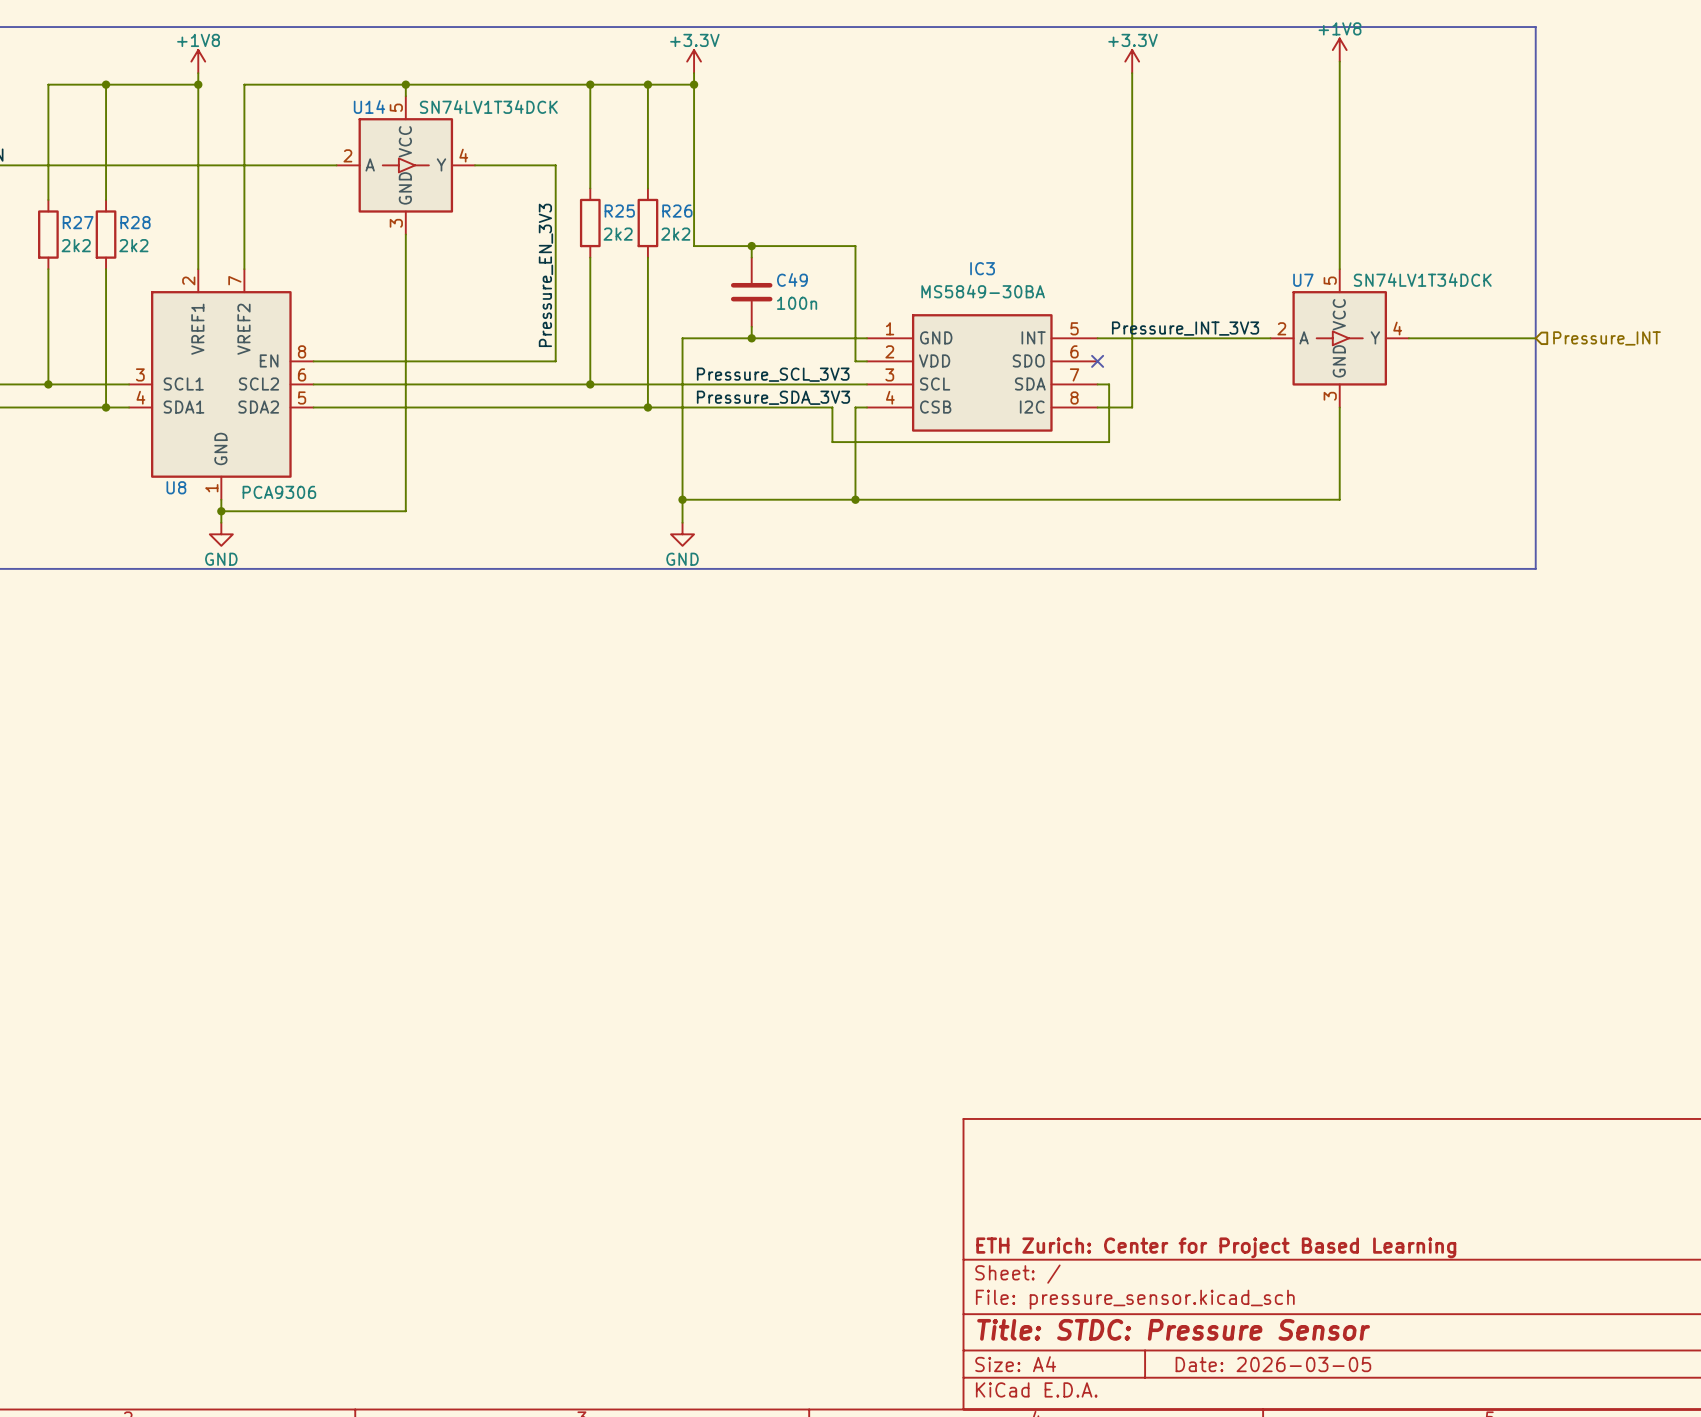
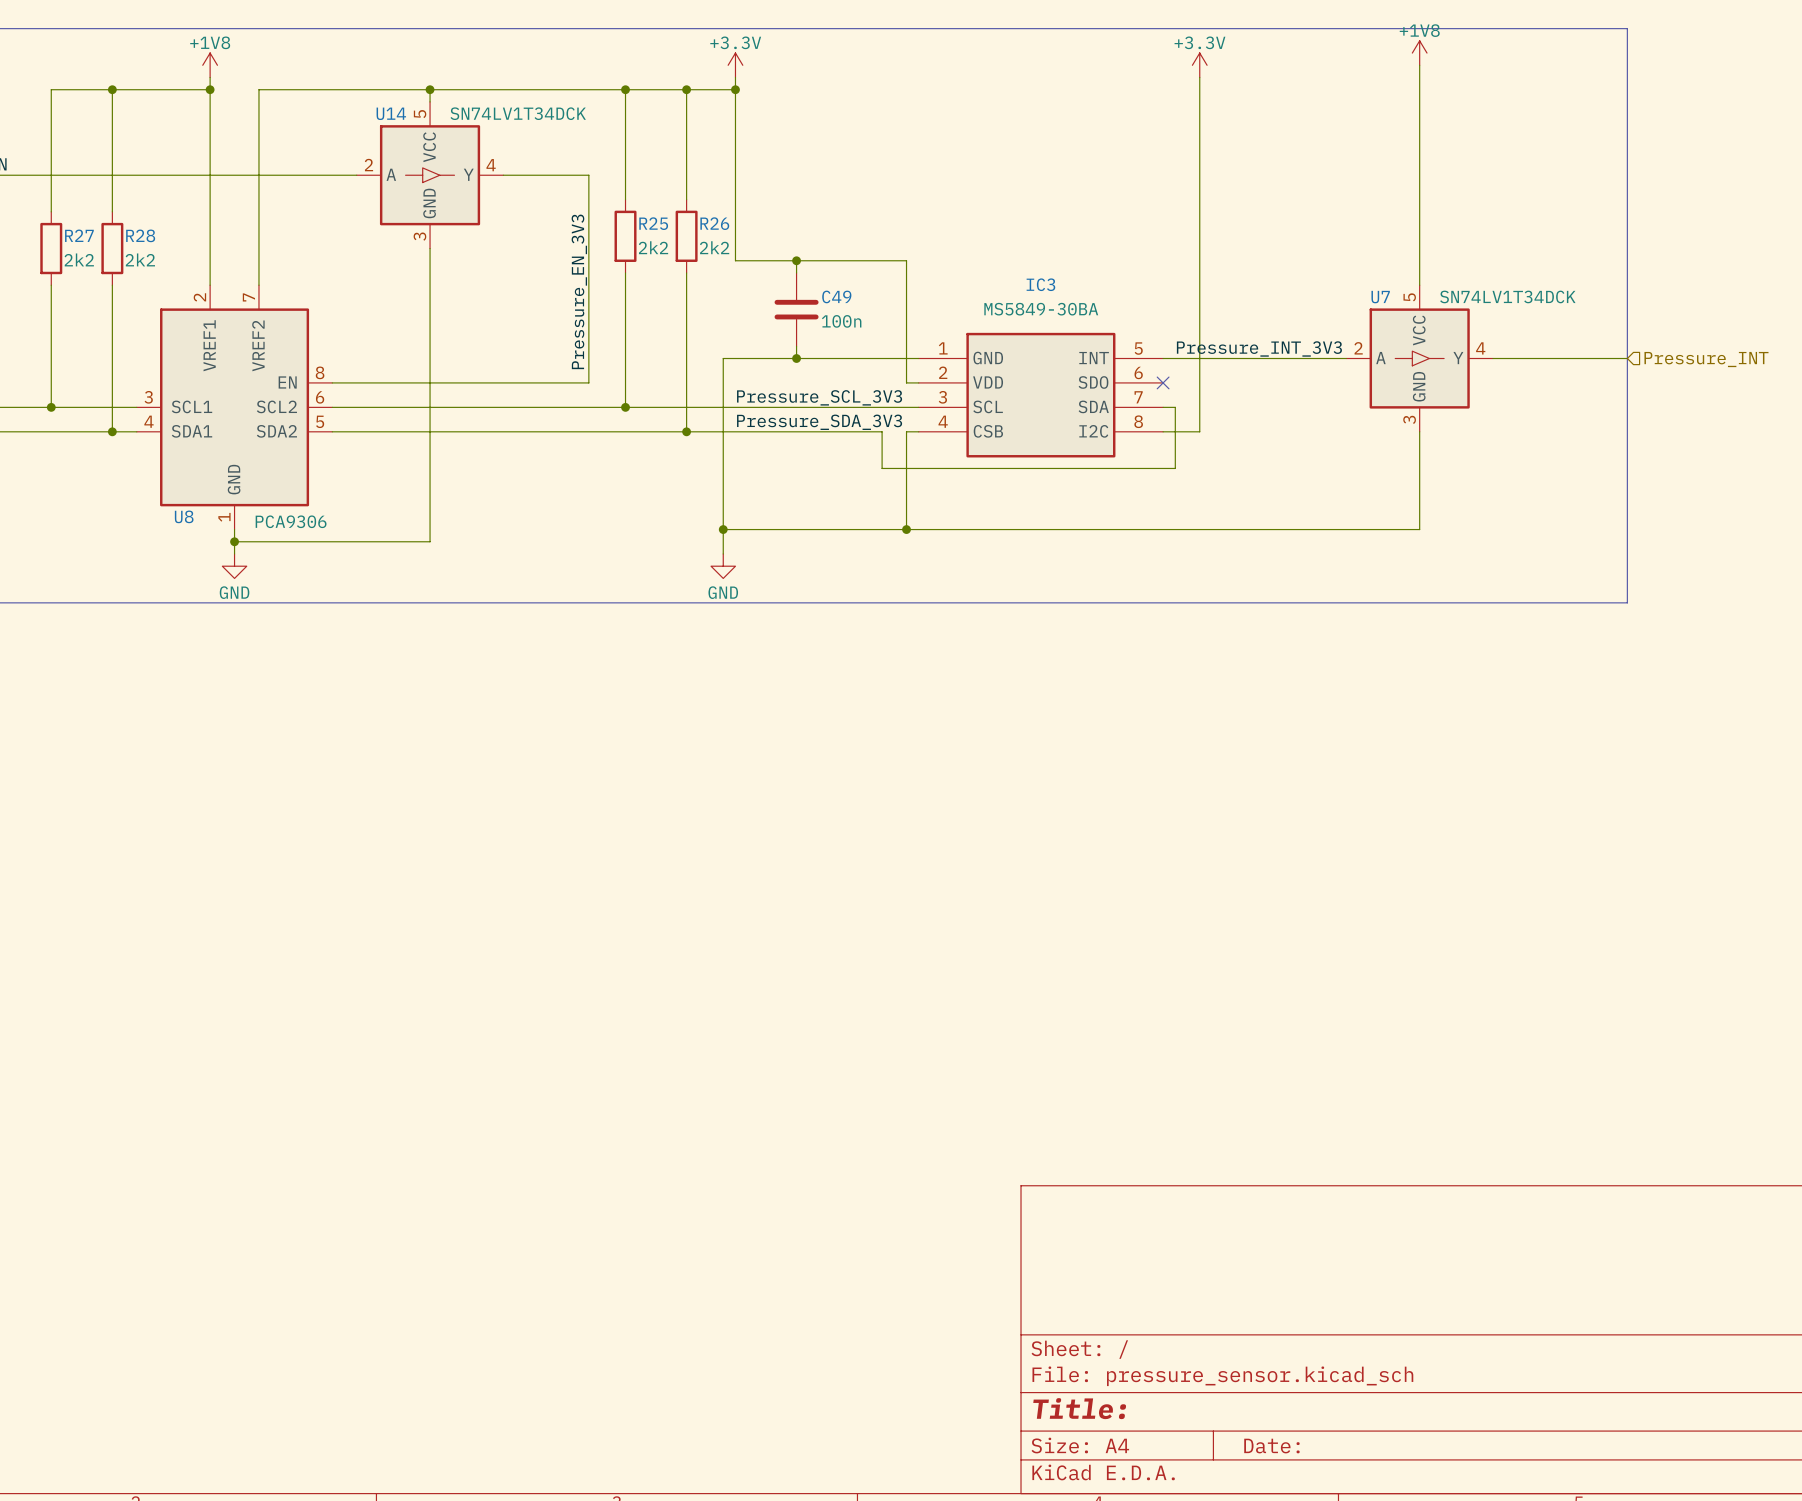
title block: ETH Zurich: Center for Project Based Learning (1216, 1247) -> none
title block: Title: STDC: Pressure Sensor (1173, 1329) -> Title: (1079, 1408)
title block: Date: 2026-03-05 (1273, 1364) -> Date: (1271, 1446)

